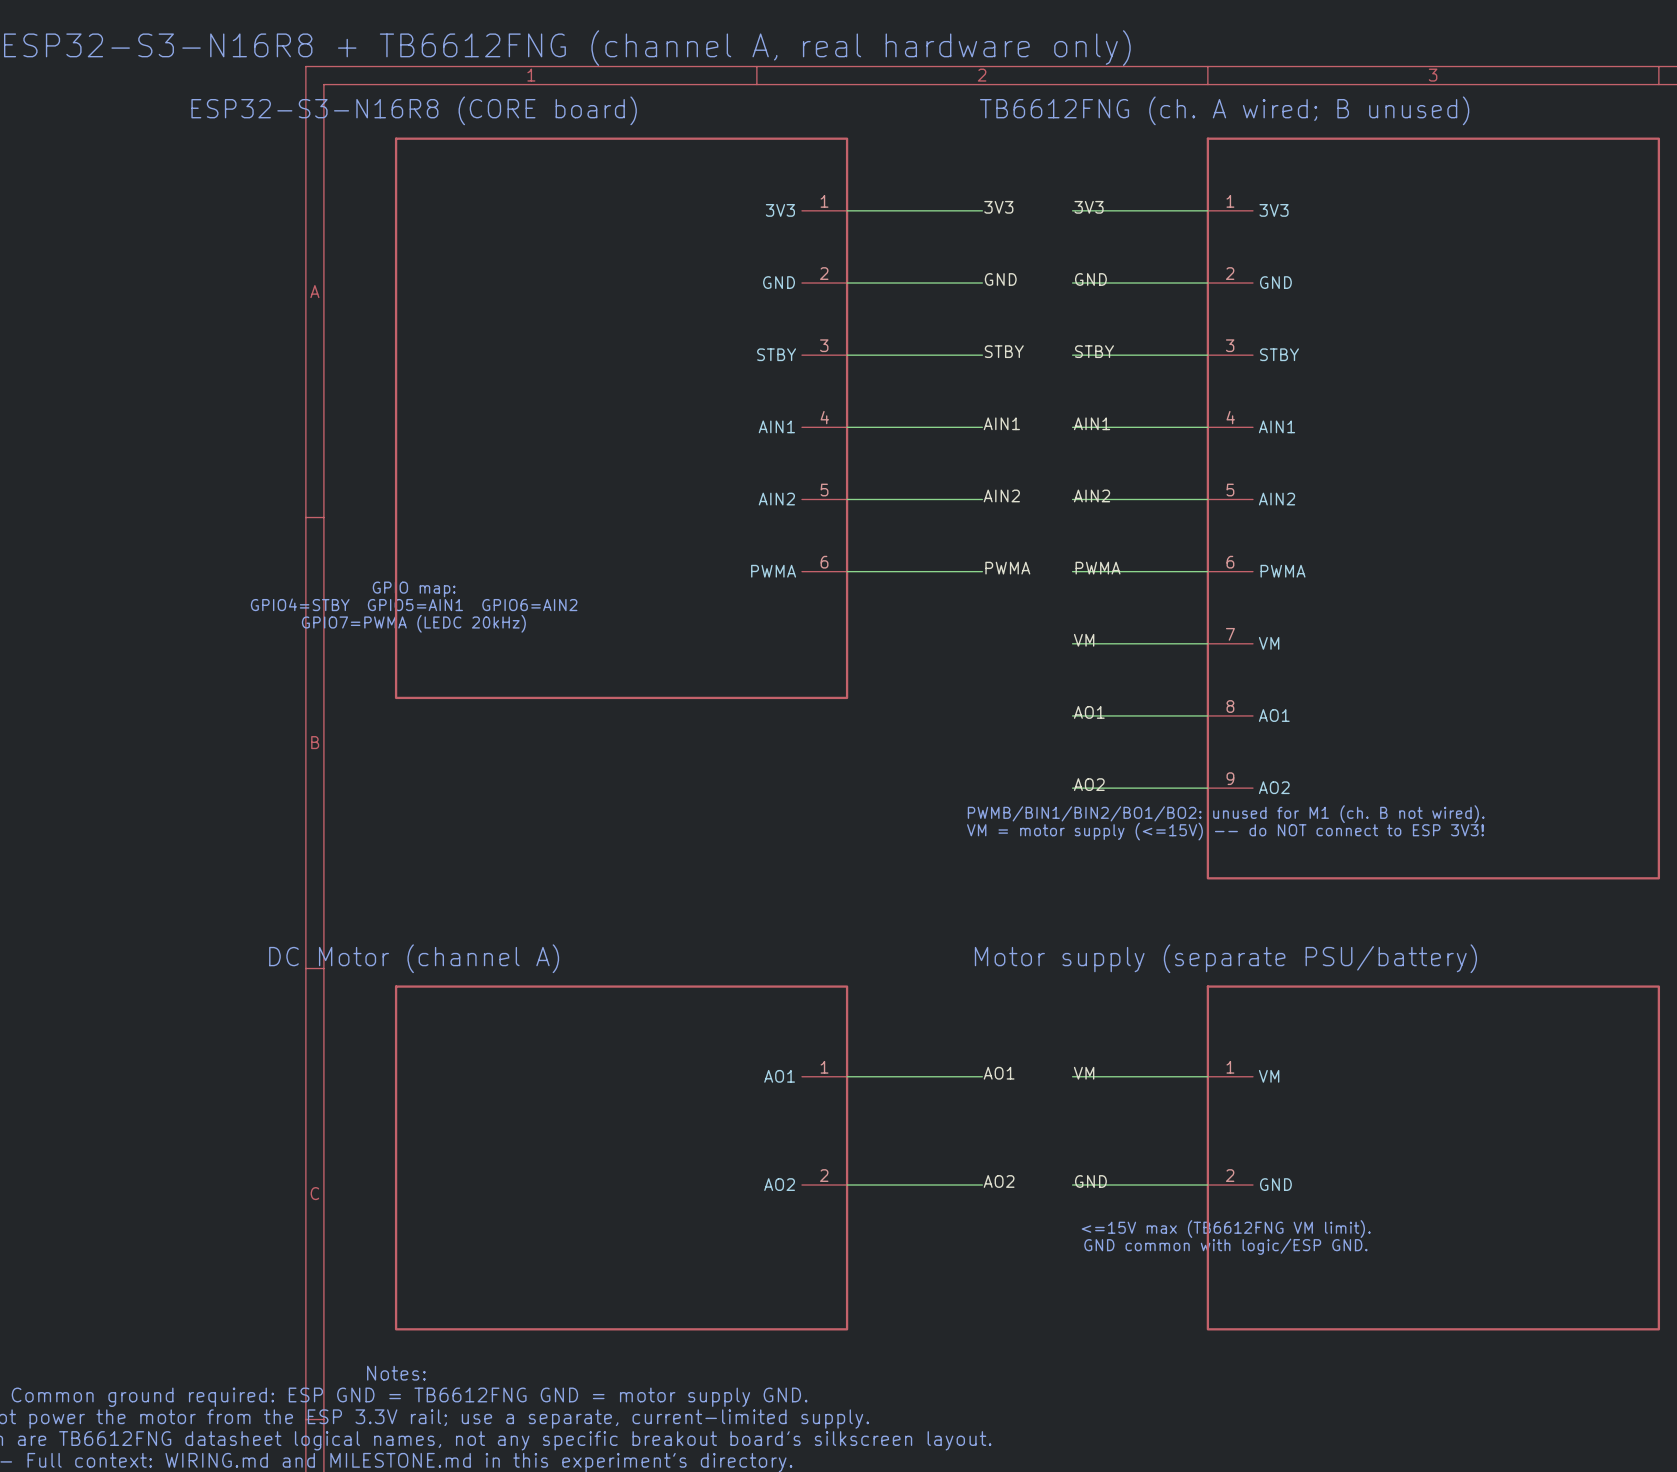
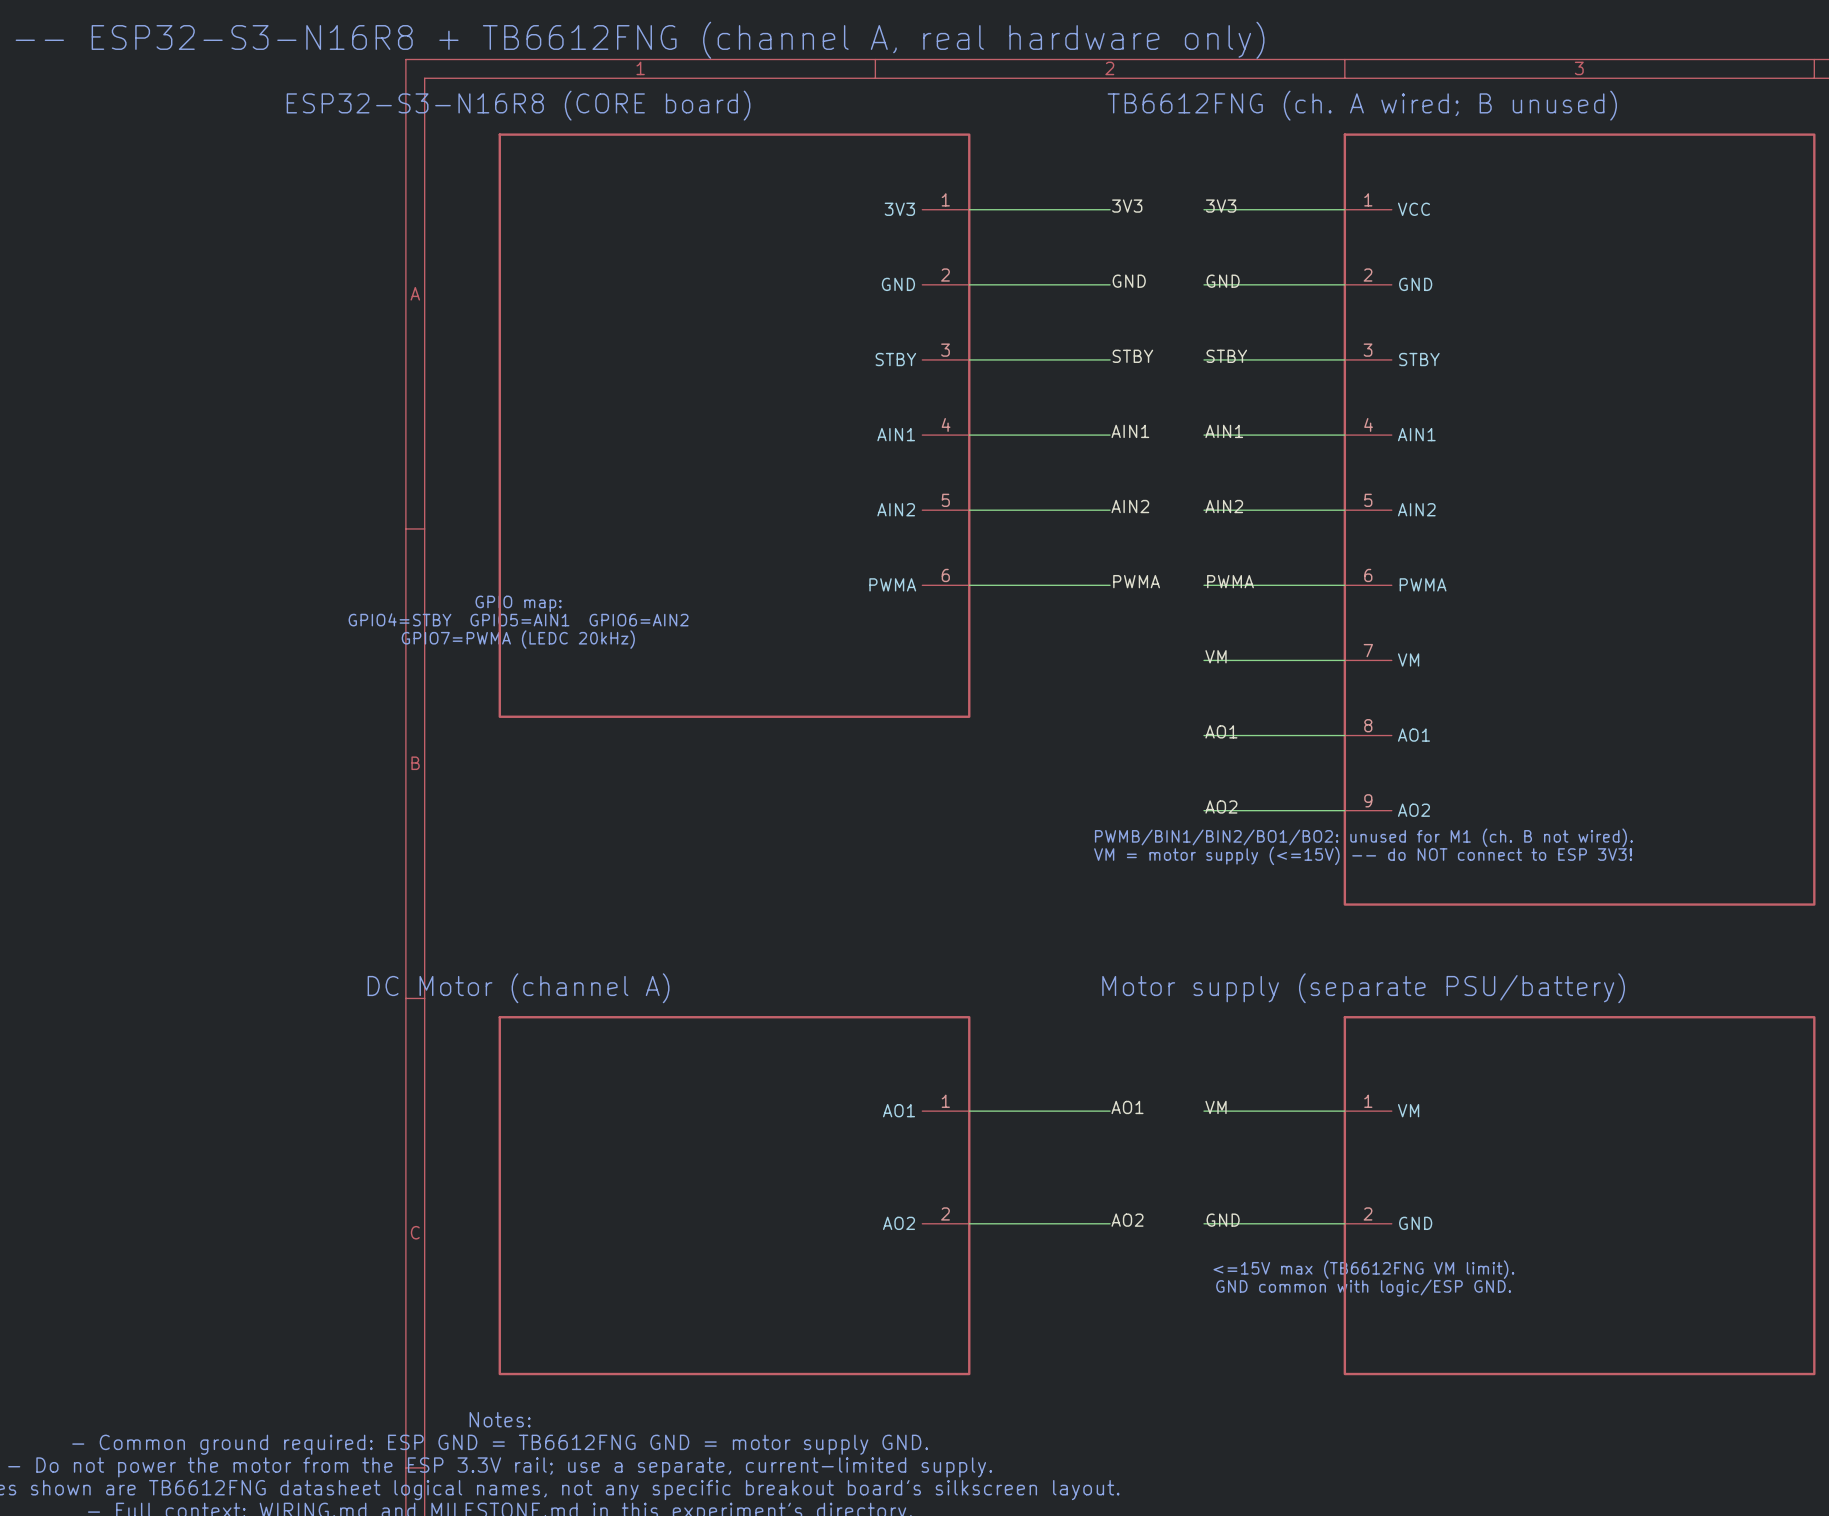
part pin name: 3V3 (1274, 210) -> VCC (1413, 209)

